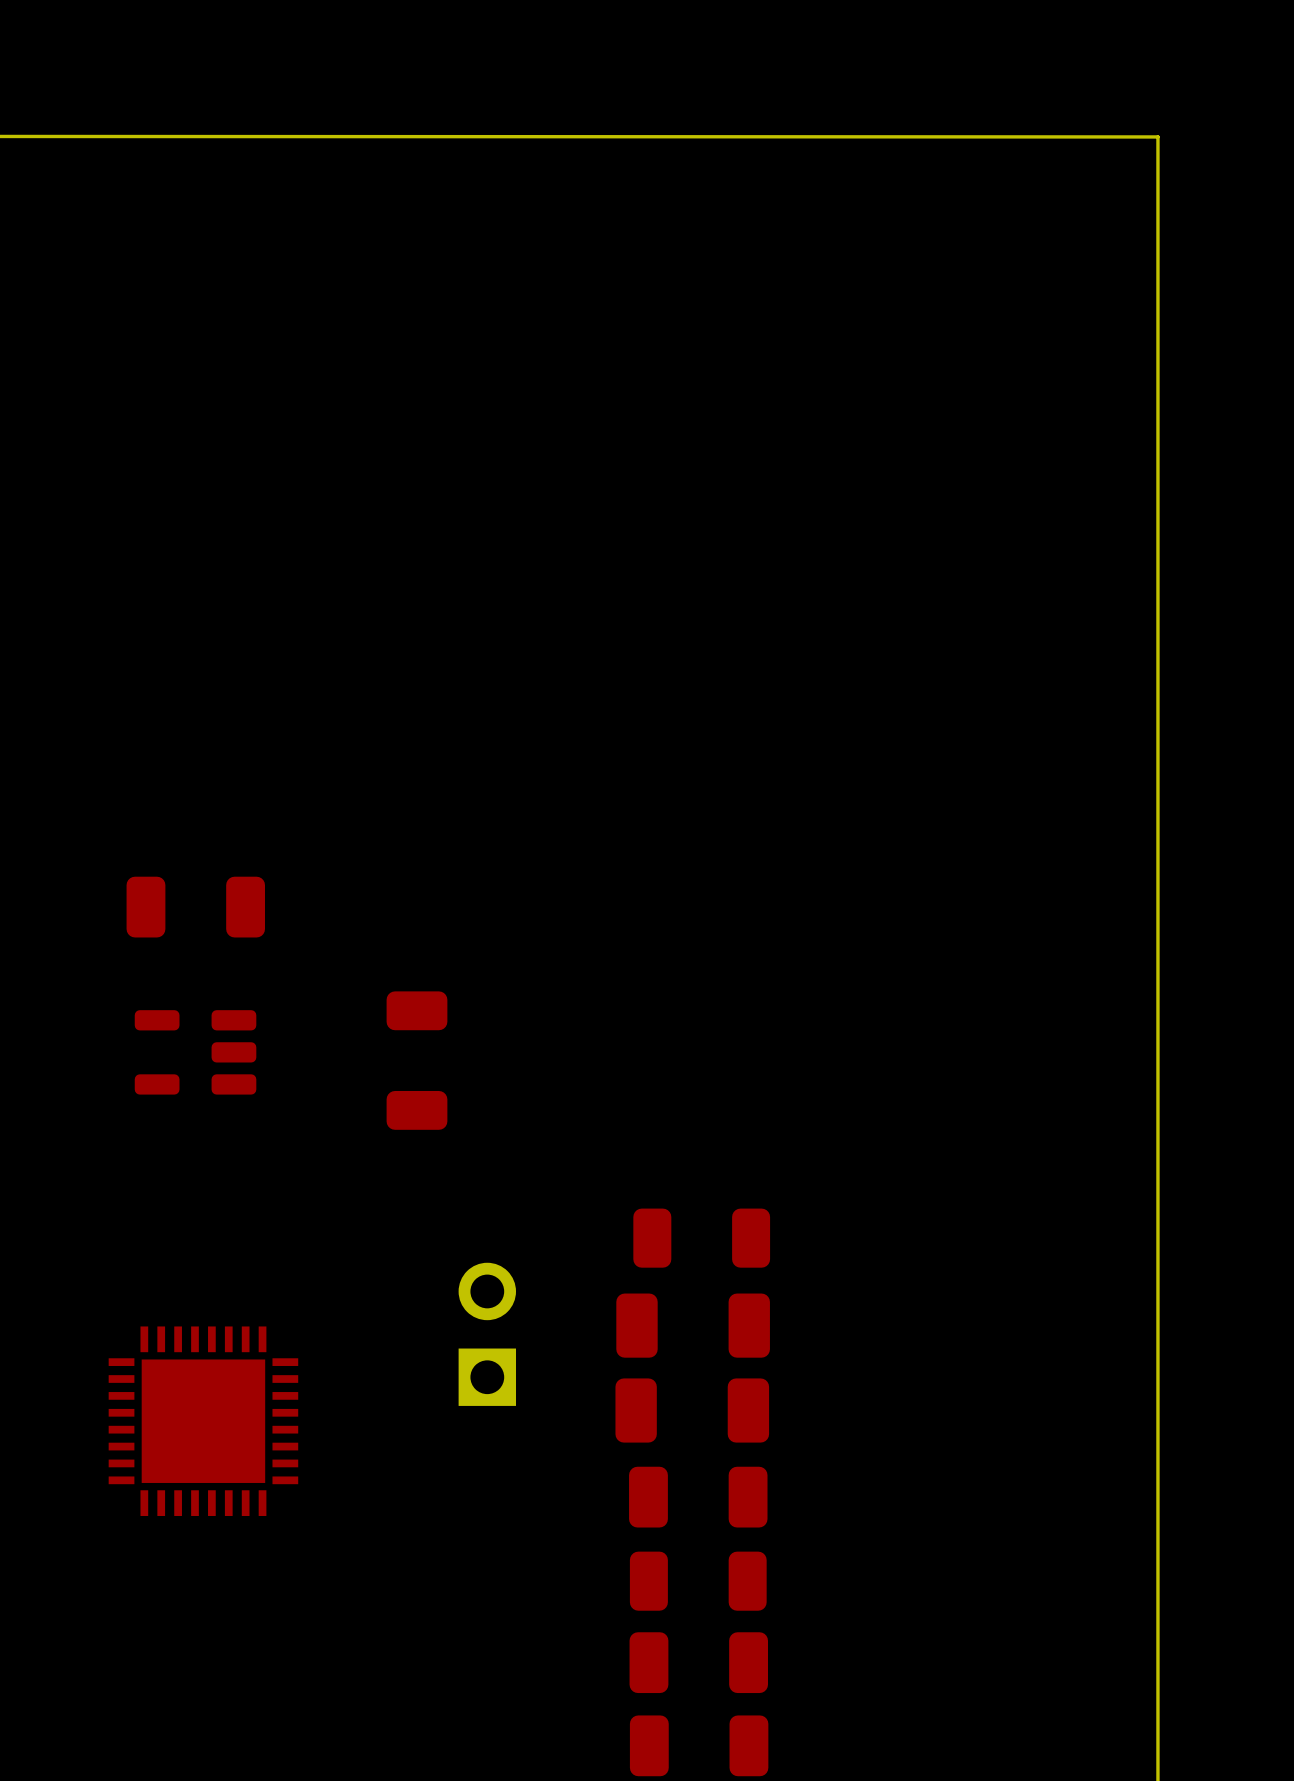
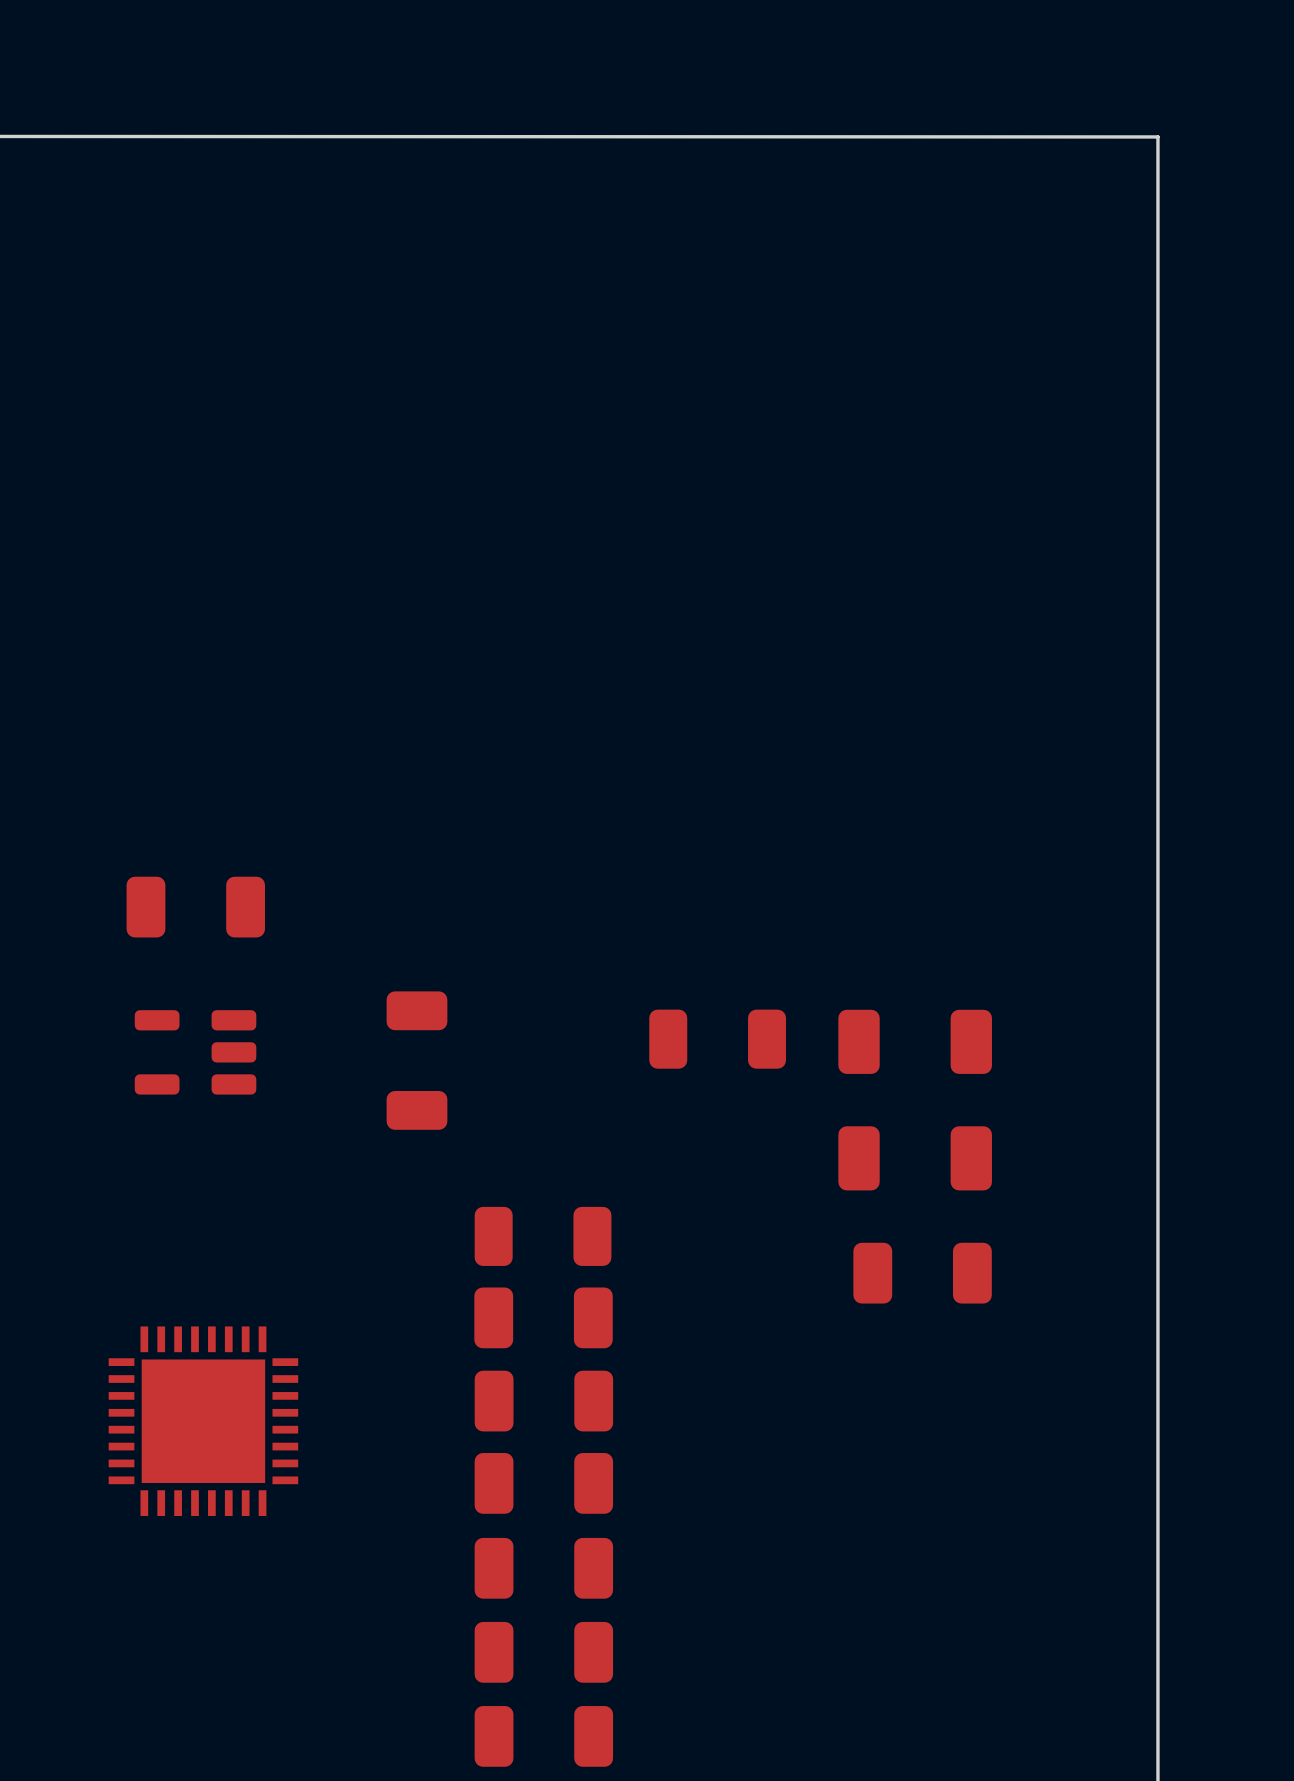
part: none -> (717, 1039)
part: none -> (915, 1041)
part: none -> (915, 1158)
part: none -> (543, 1236)
part: (701, 1238) -> none
part: none -> (922, 1273)
part: none -> (543, 1317)
part: (693, 1325) -> none
part: (487, 1334) -> none
part: none -> (543, 1401)
part: (692, 1410) -> none
part: none -> (543, 1483)
part: (698, 1497) -> none
part: none -> (543, 1568)
part: (698, 1581) -> none
part: none -> (543, 1652)
part: (698, 1662) -> none
part: none -> (543, 1736)
part: (699, 1745) -> none

